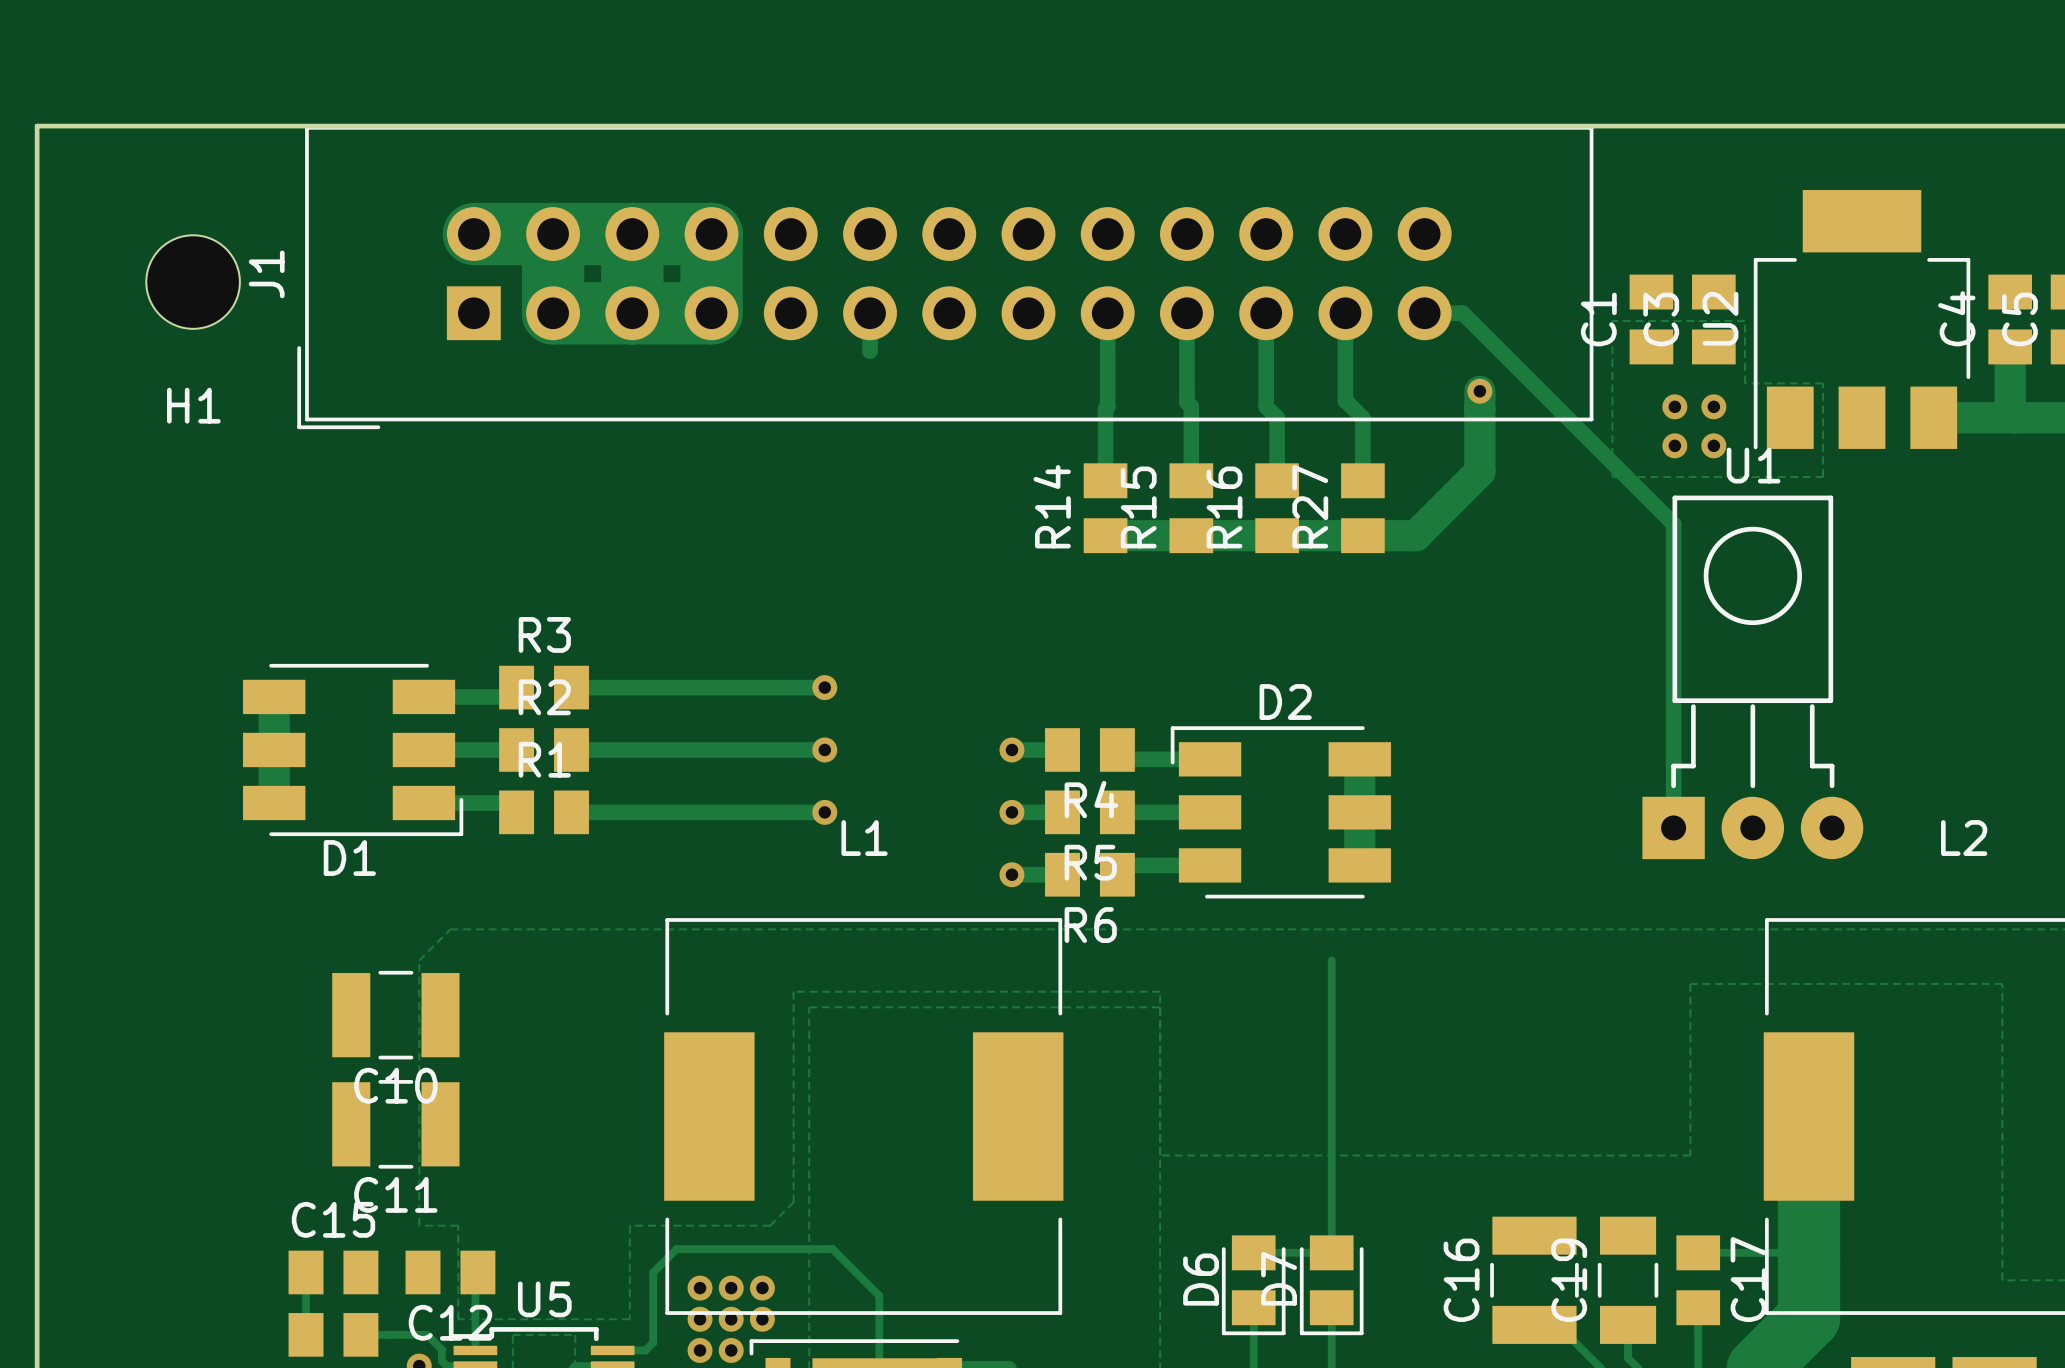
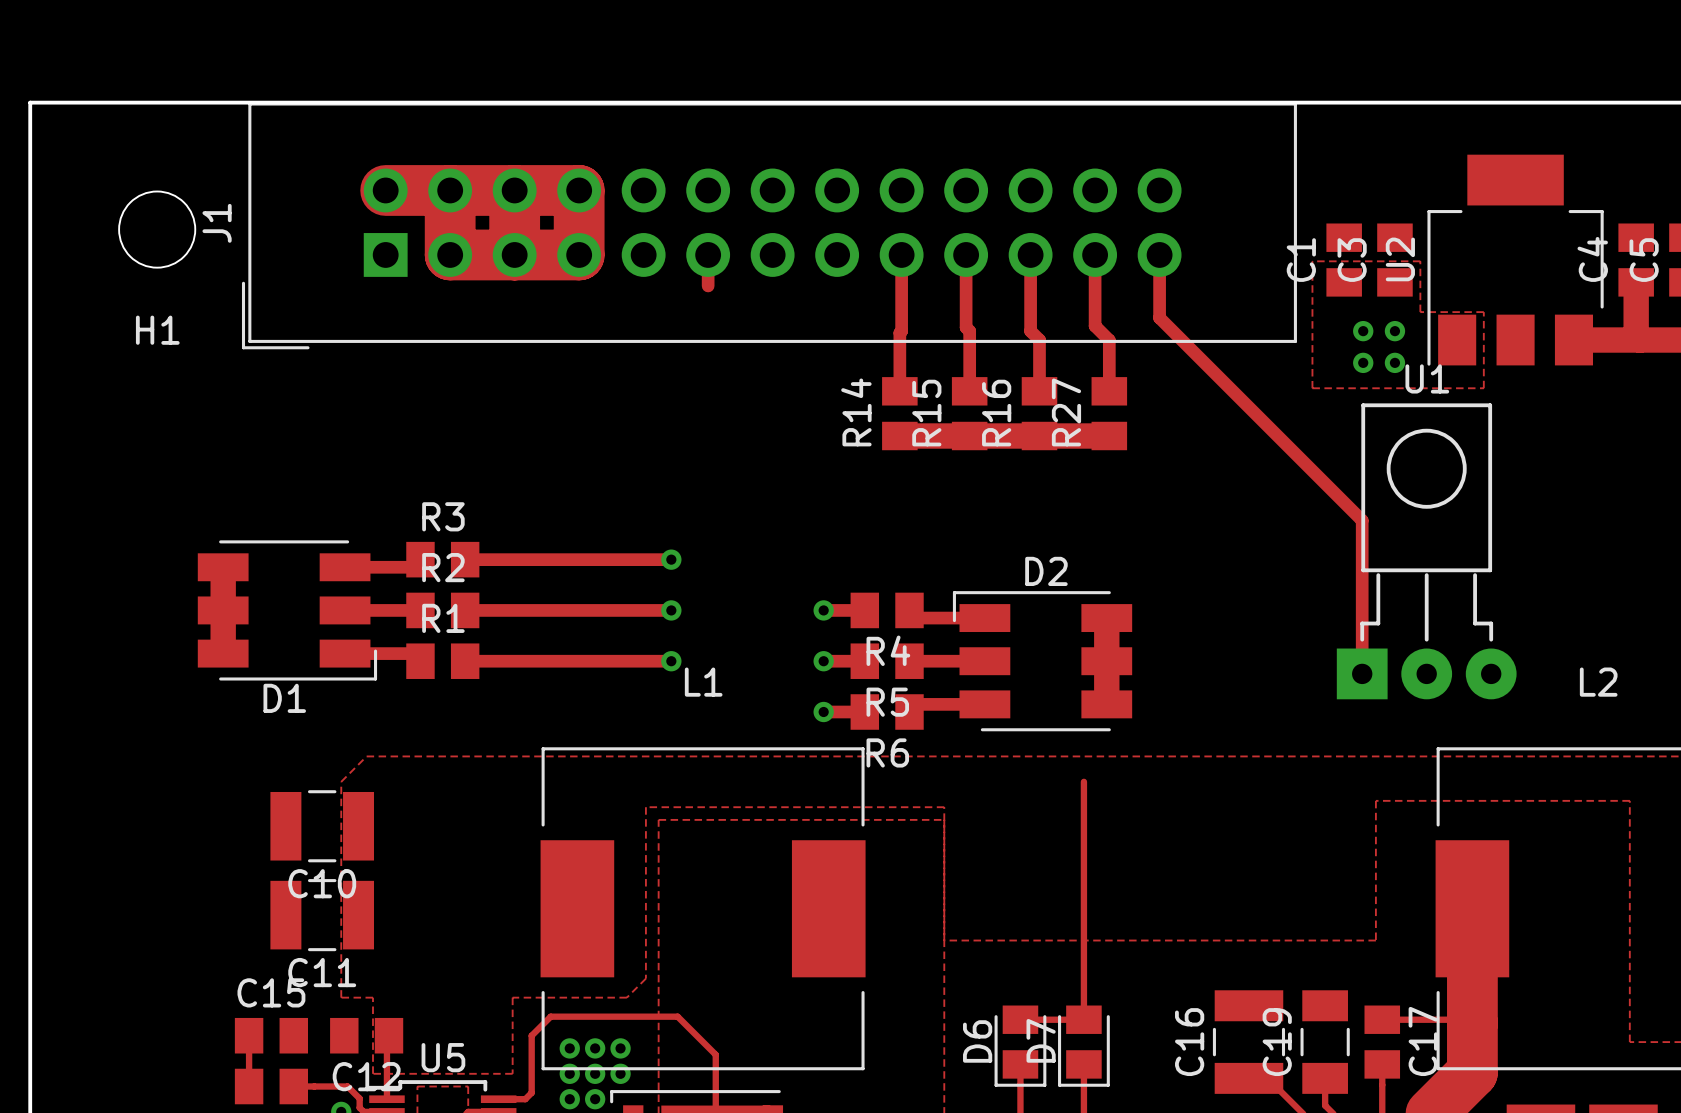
track: (1424, 313) (1462, 313) (1673, 524) (1673, 639) -> (1159, 254) (1159, 317) (1362, 520)
track: (1479, 391) (1479, 471) (1415, 535) (1362, 535) -> none
via: (1479, 391) -> none

